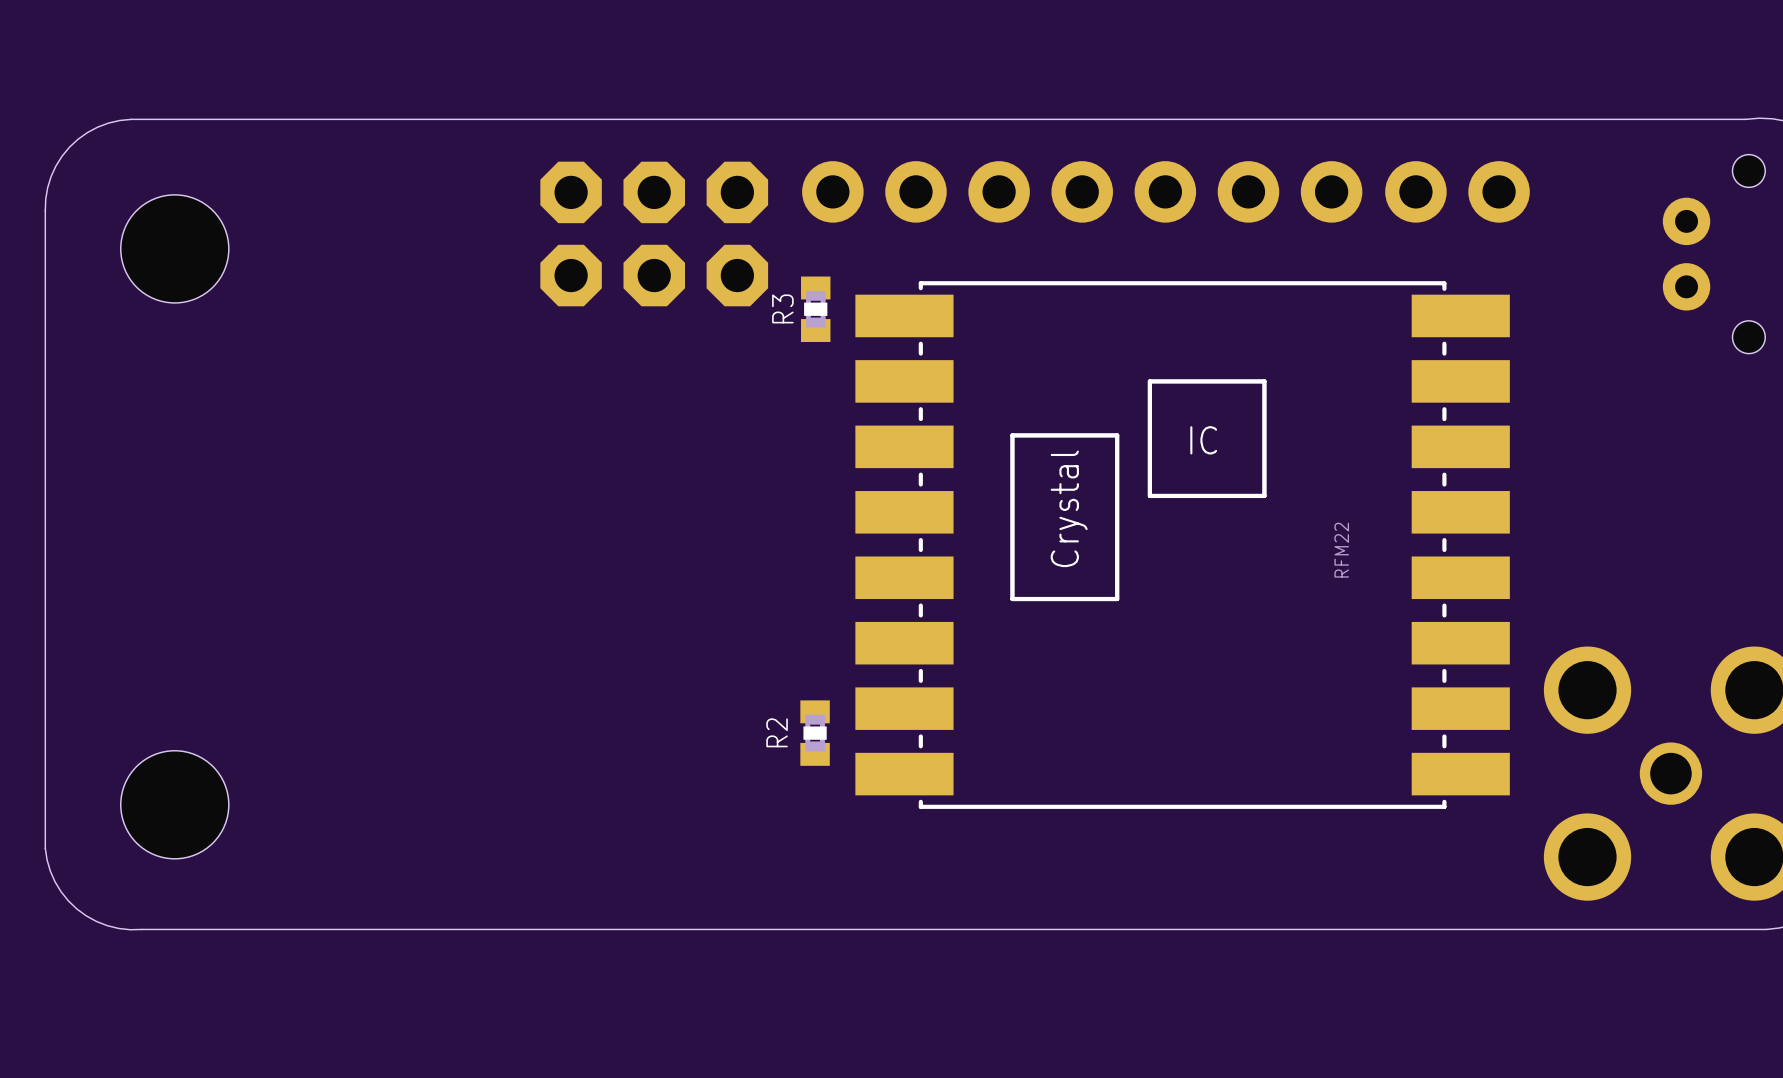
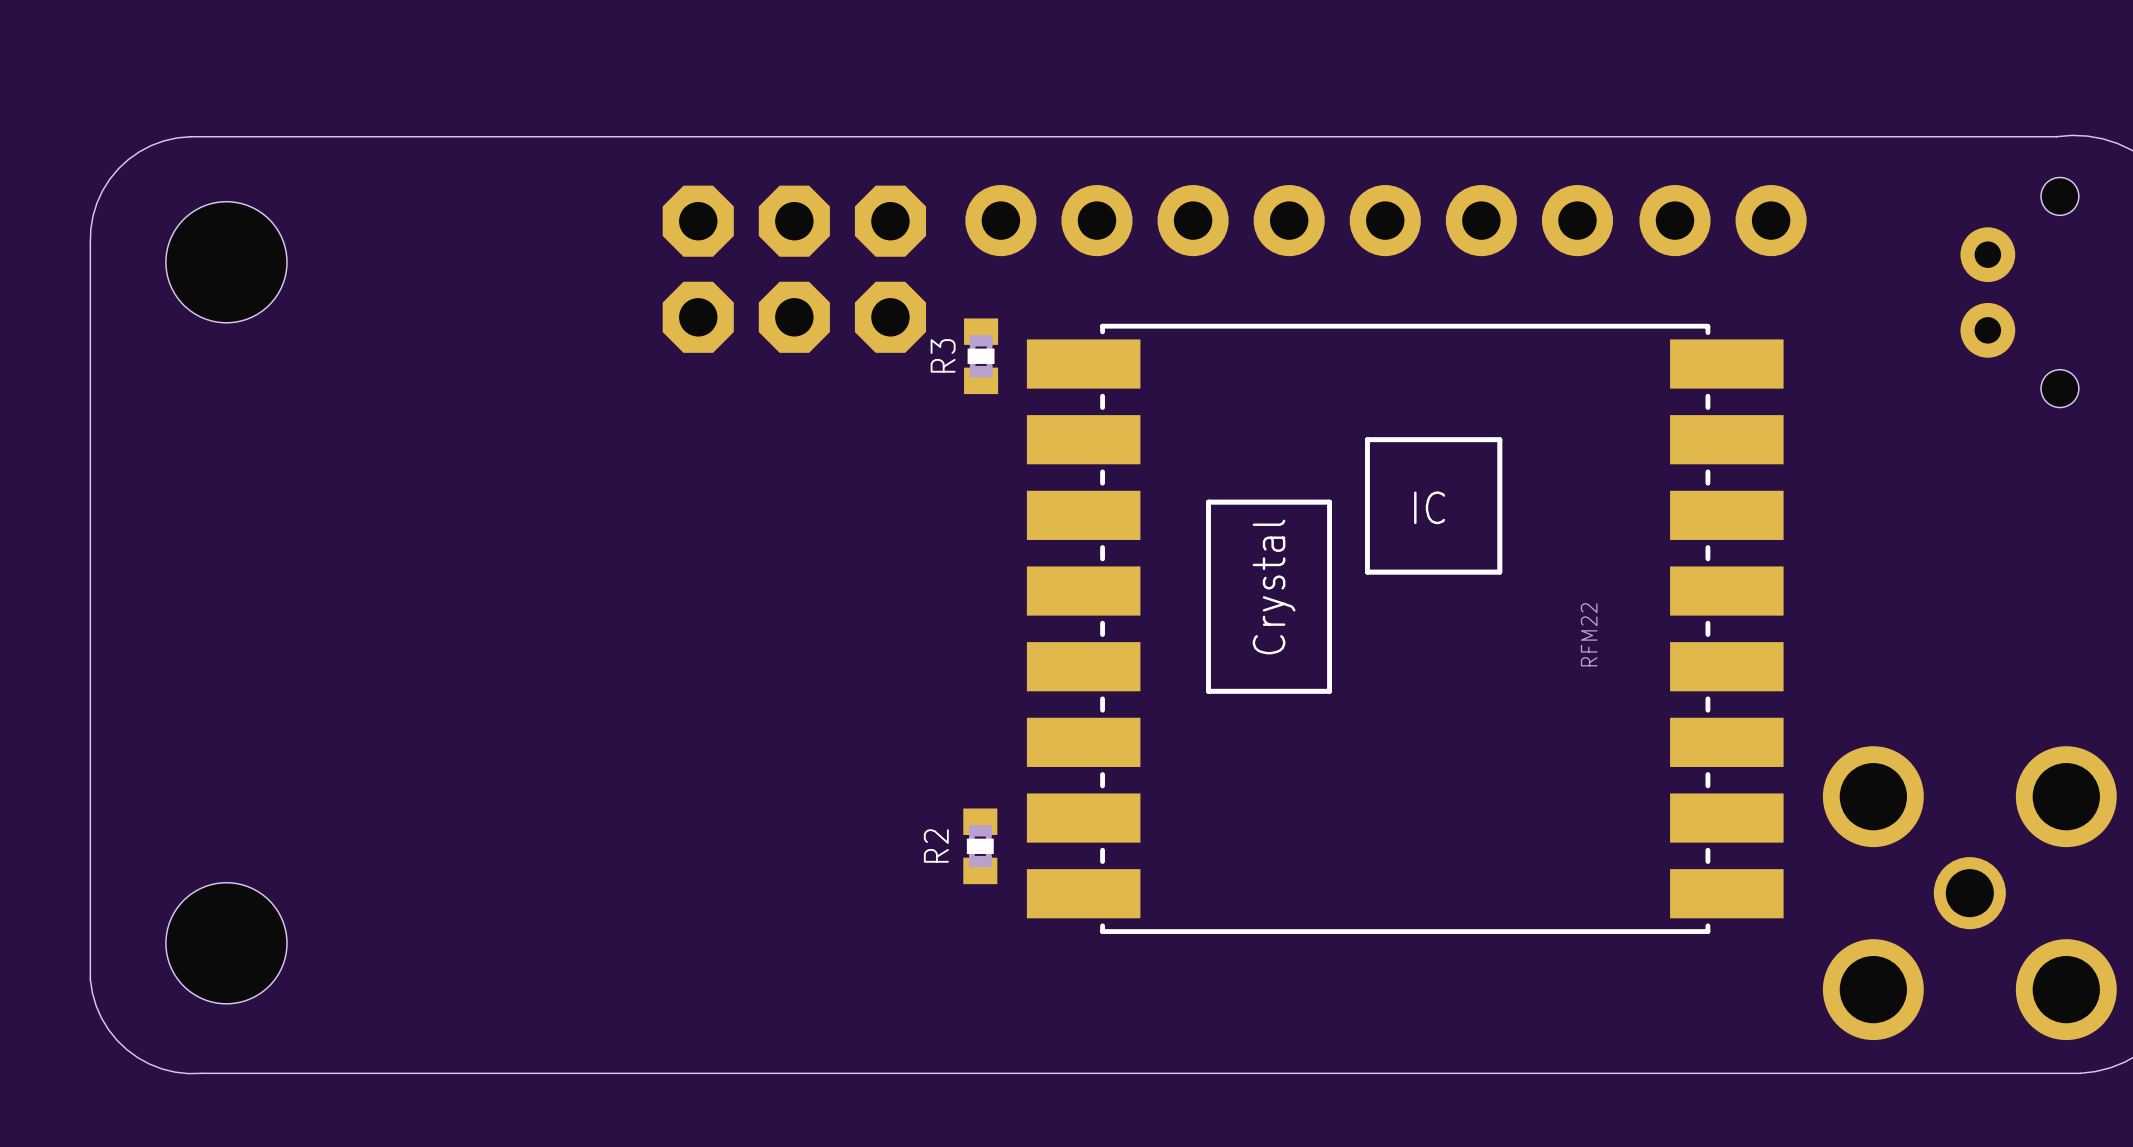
hole: none -> (226, 262)
part: (174, 248) -> none
part: (174, 804) -> none
hole: none -> (226, 943)

